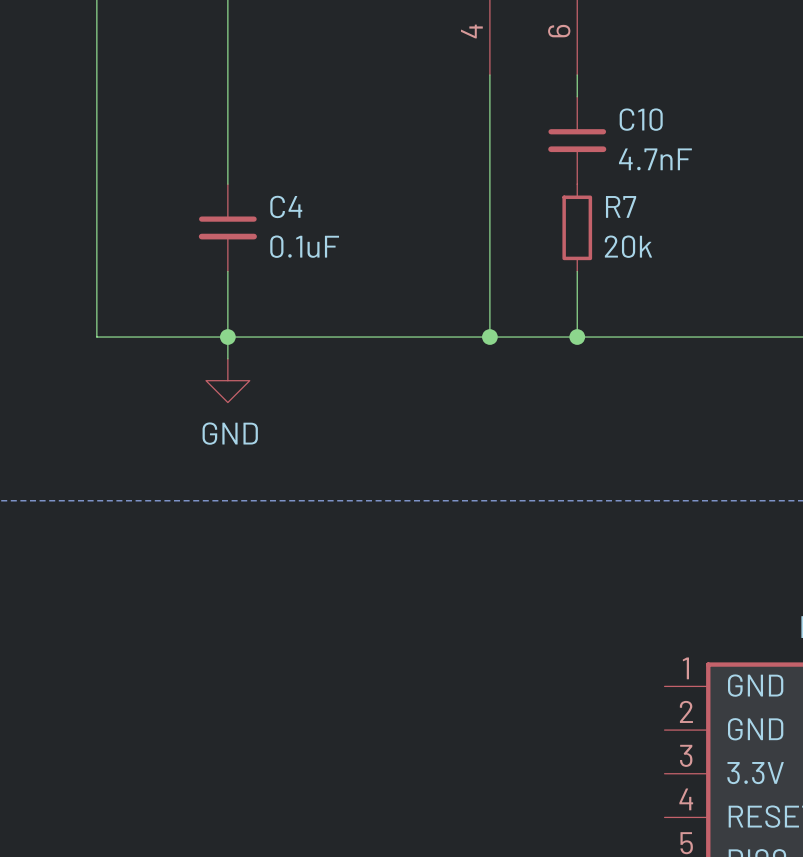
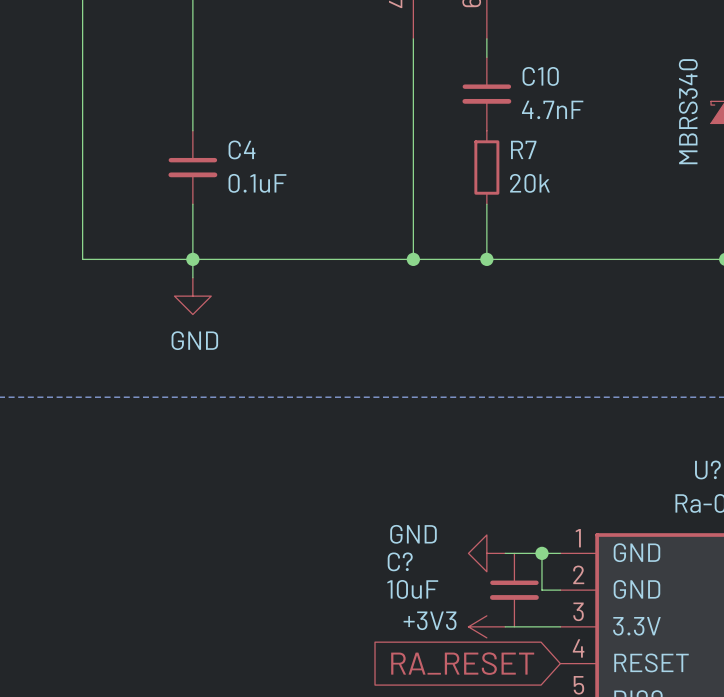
power symbol: none -> GND (486, 553)
wire: none -> (505, 553) (560, 553)
wire: none -> (541, 553) (541, 590) (560, 590)
junction: none -> (541, 553)
C?: none -> 10uF (514, 590)
power symbol: none -> +3V3 (486, 626)
wire: none -> (505, 626) (560, 626)
global label: none -> RA_RESET (462, 663)

